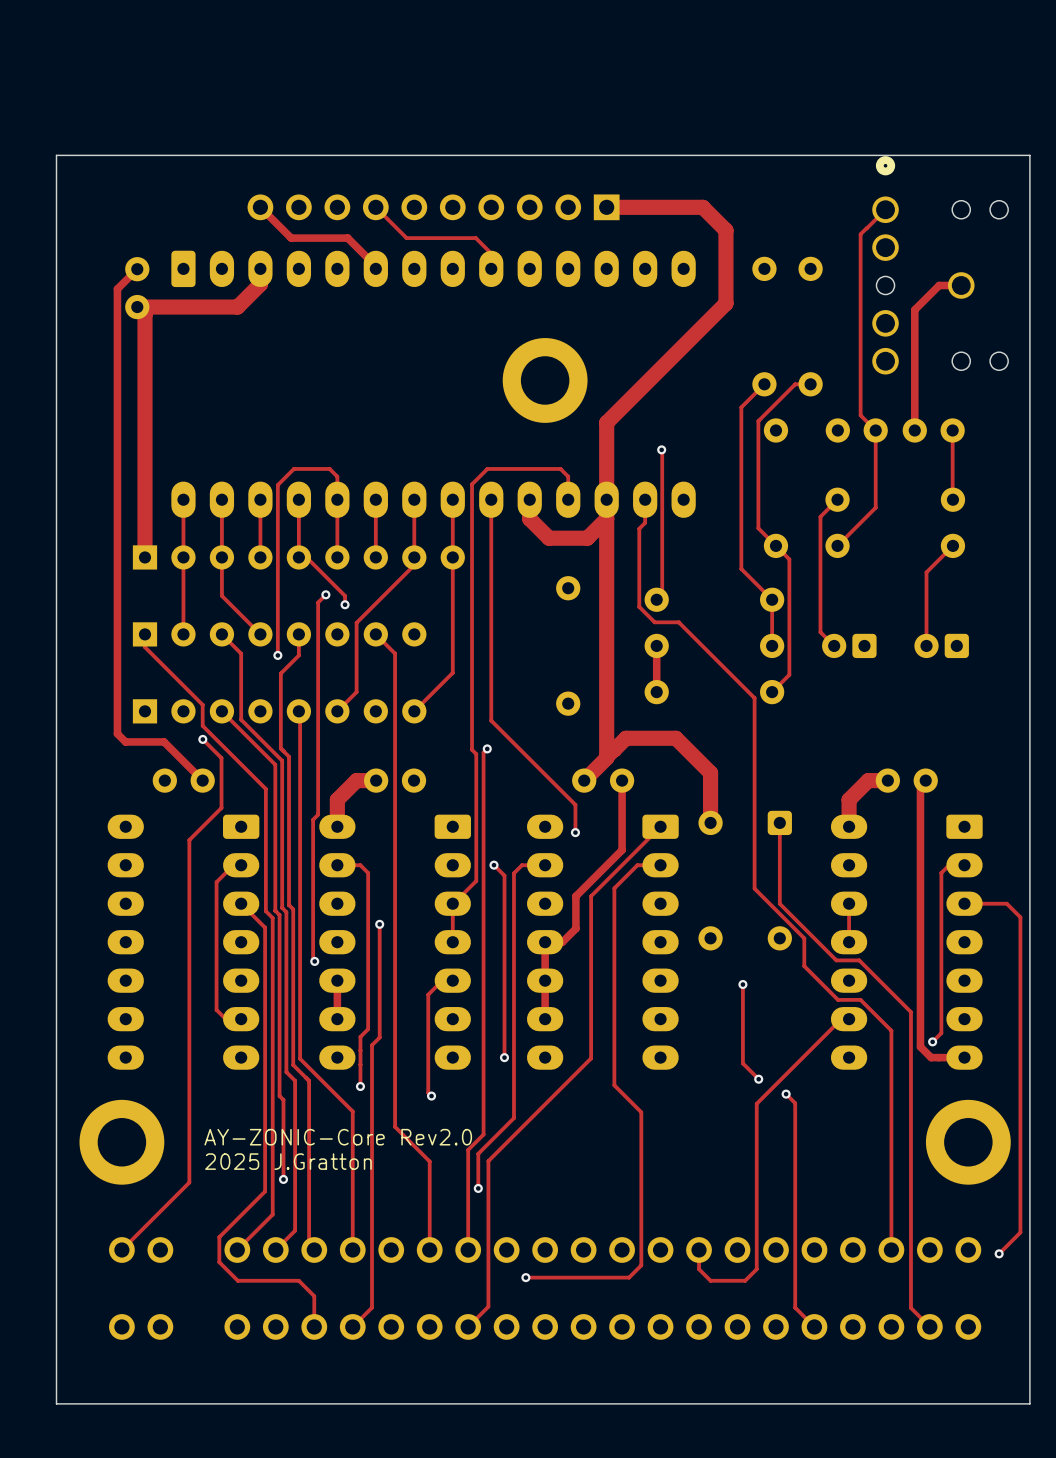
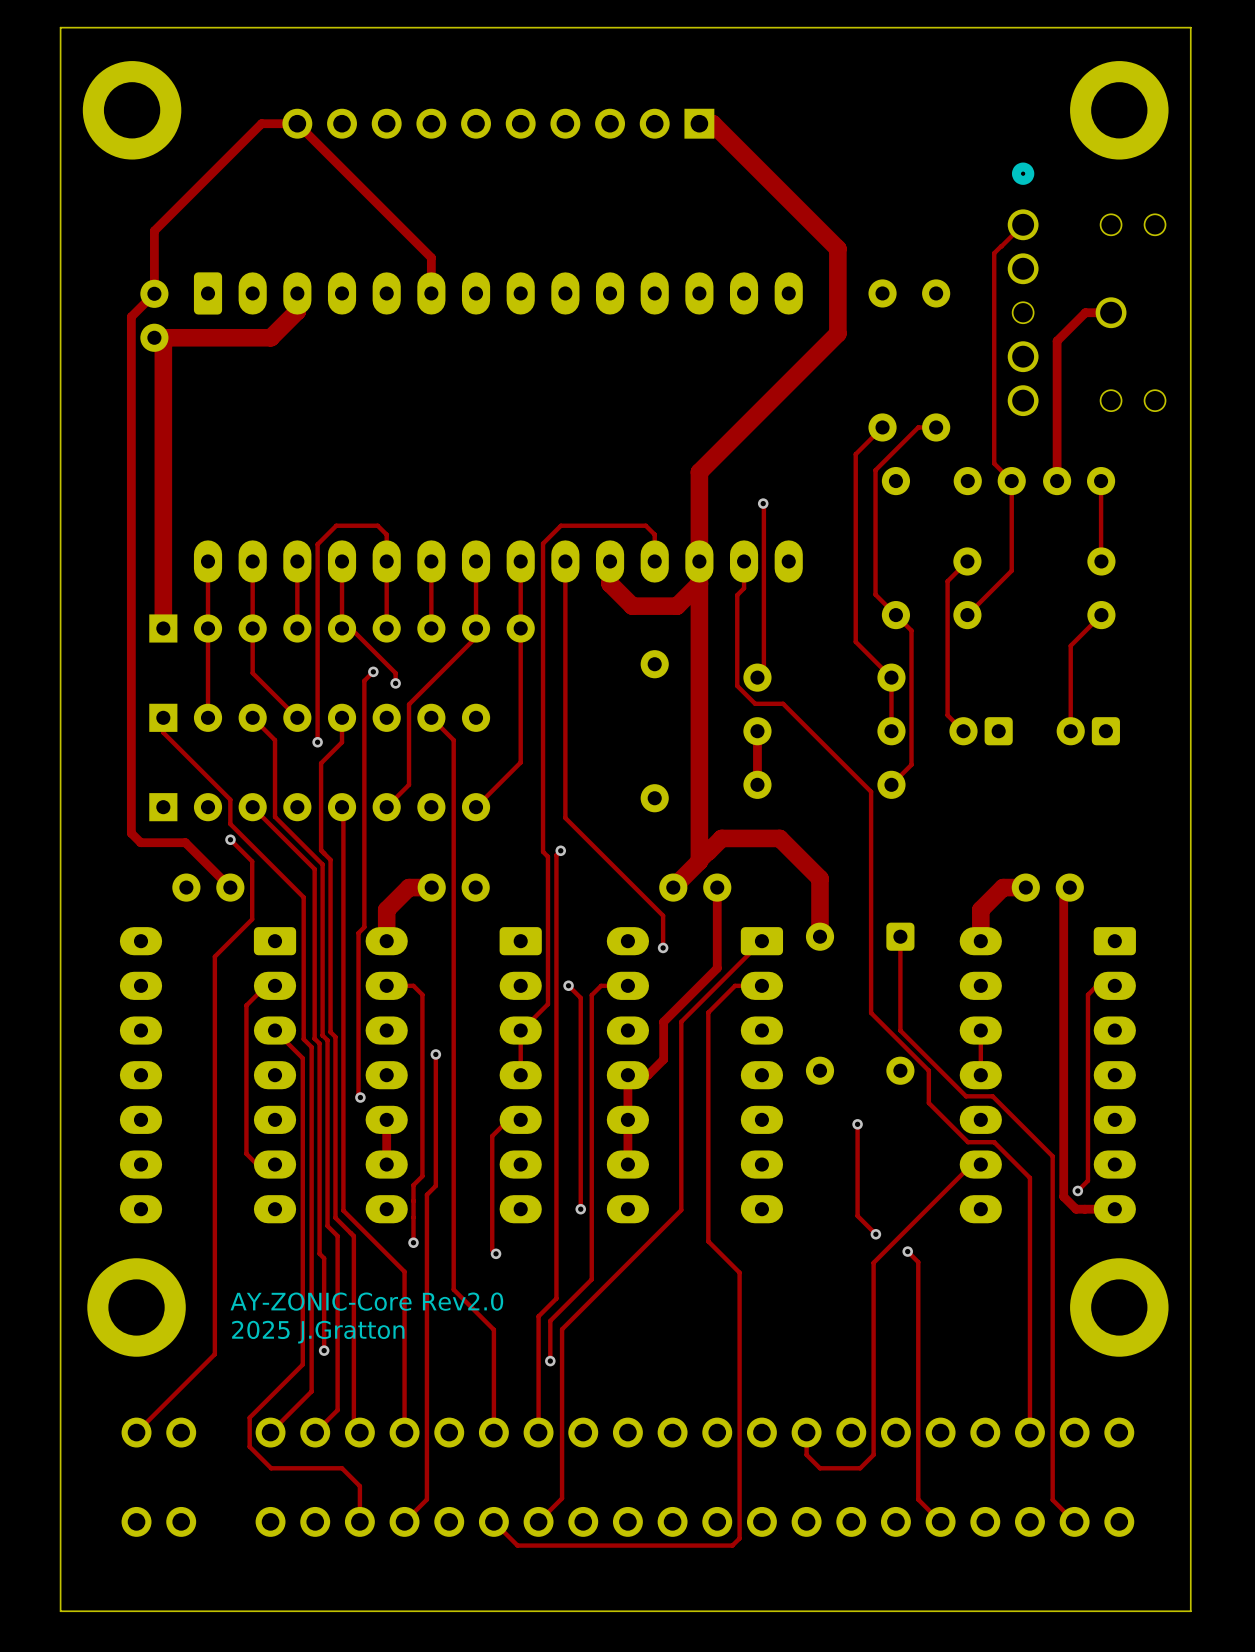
part: none -> (132, 110)
part: none -> (1119, 110)
board edge: (56, 155) (1029, 155) -> (60, 161) (60, 27) (1190, 27) (1190, 161)
track: (260, 207) (291, 238) (347, 238) (375, 266) -> (154, 293) (154, 230) (261, 123) (297, 123) (431, 257) (431, 290)
track: (375, 207) (406, 238) (475, 238) (491, 253) -> none
part position: (433, 207) -> (498, 123)
track: (606, 207) (702, 207) -> (699, 123) (712, 123) (811, 221)
part: (545, 380) -> none
track: (964, 903) (1006, 903) (1020, 917) (1020, 1232) (999, 1253) -> none
via: (999, 1253) -> none
track: (641, 1265) (629, 1277) (525, 1277) -> (739, 1450) (739, 1538) (732, 1545) (517, 1545) (493, 1521)
via: (525, 1277) -> none

